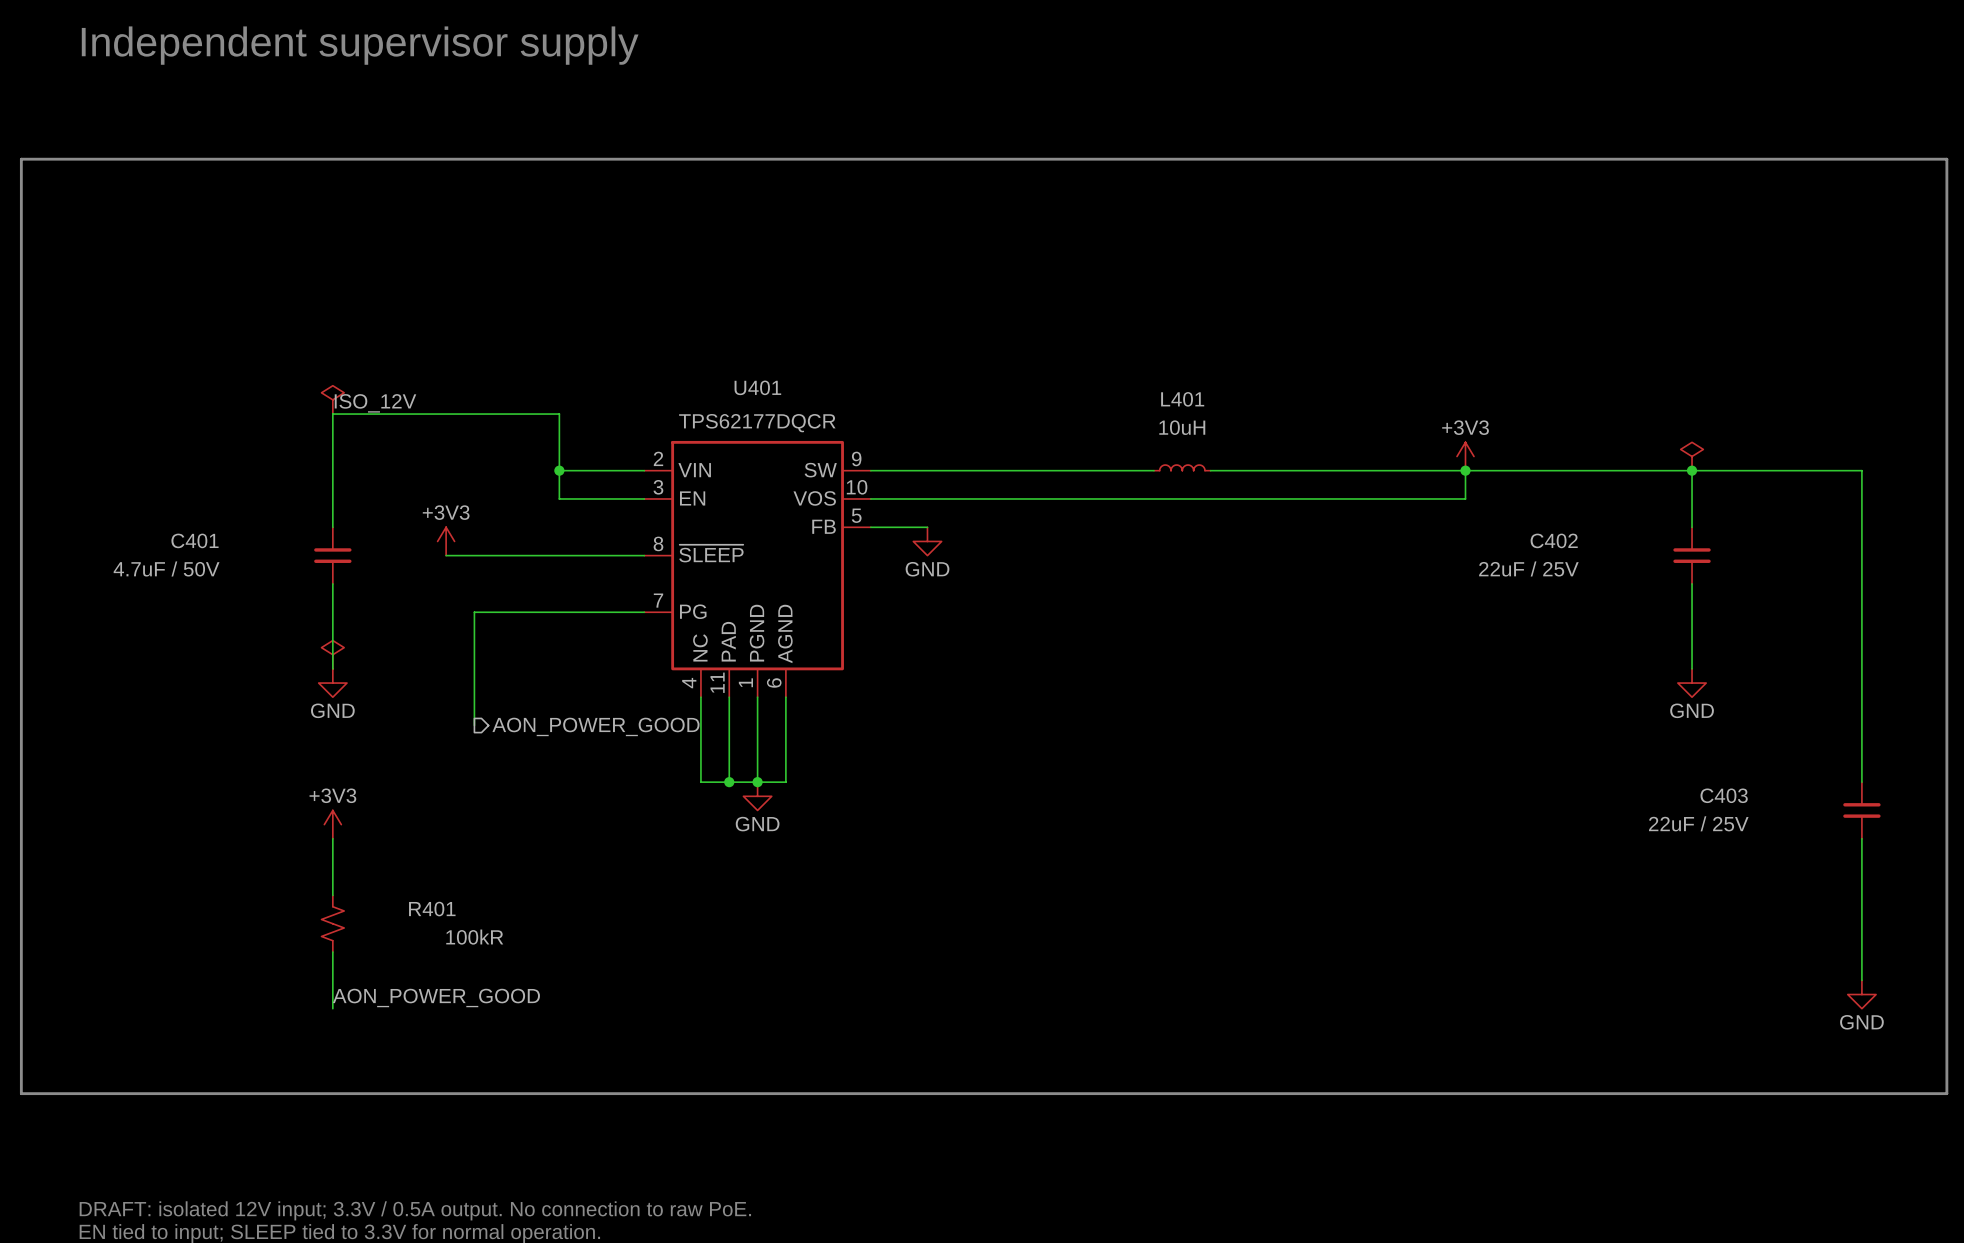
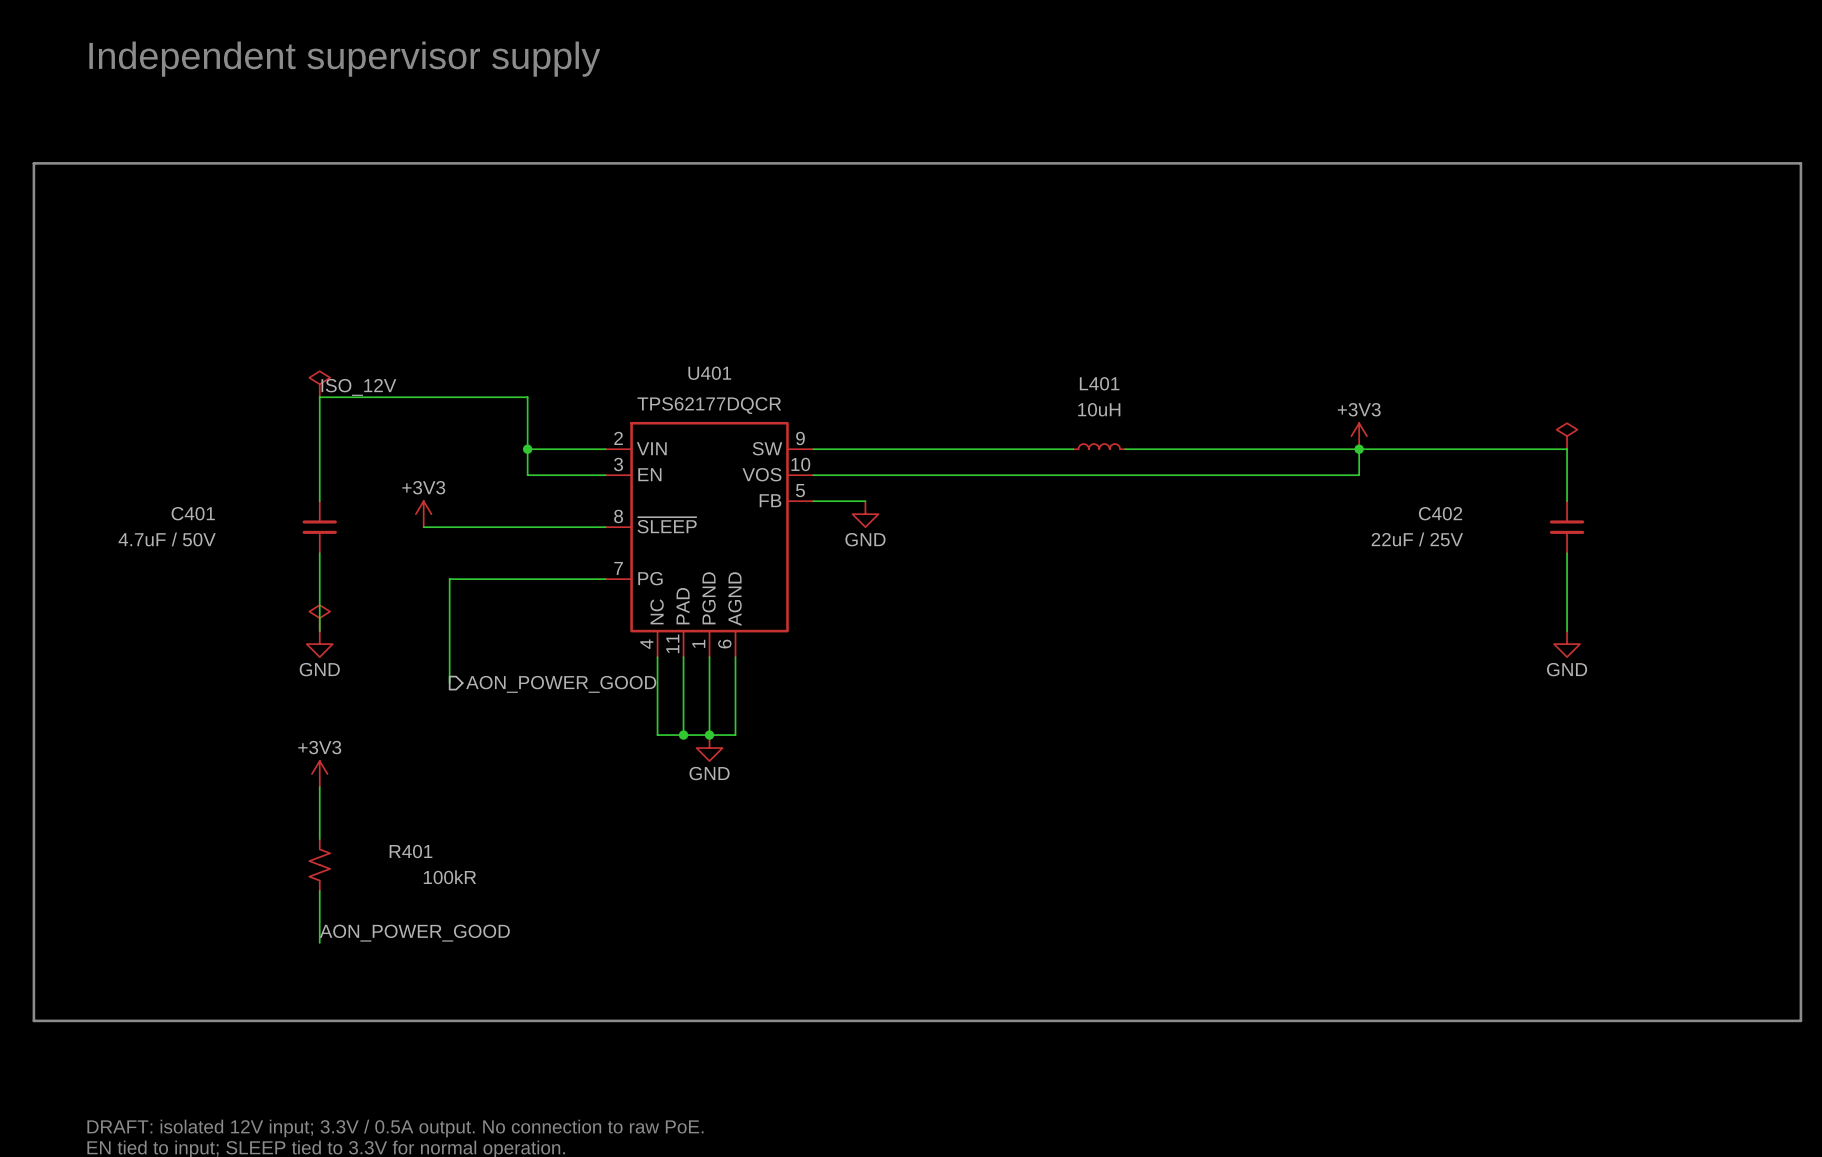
wire: (1692, 470) (1861, 470) (1861, 782) -> none
junction: (1692, 470) -> none
C403: 22uF / 25V (1861, 810) -> none
wire: (1861, 838) (1861, 980) -> none
power symbol: GND (1861, 994) -> none

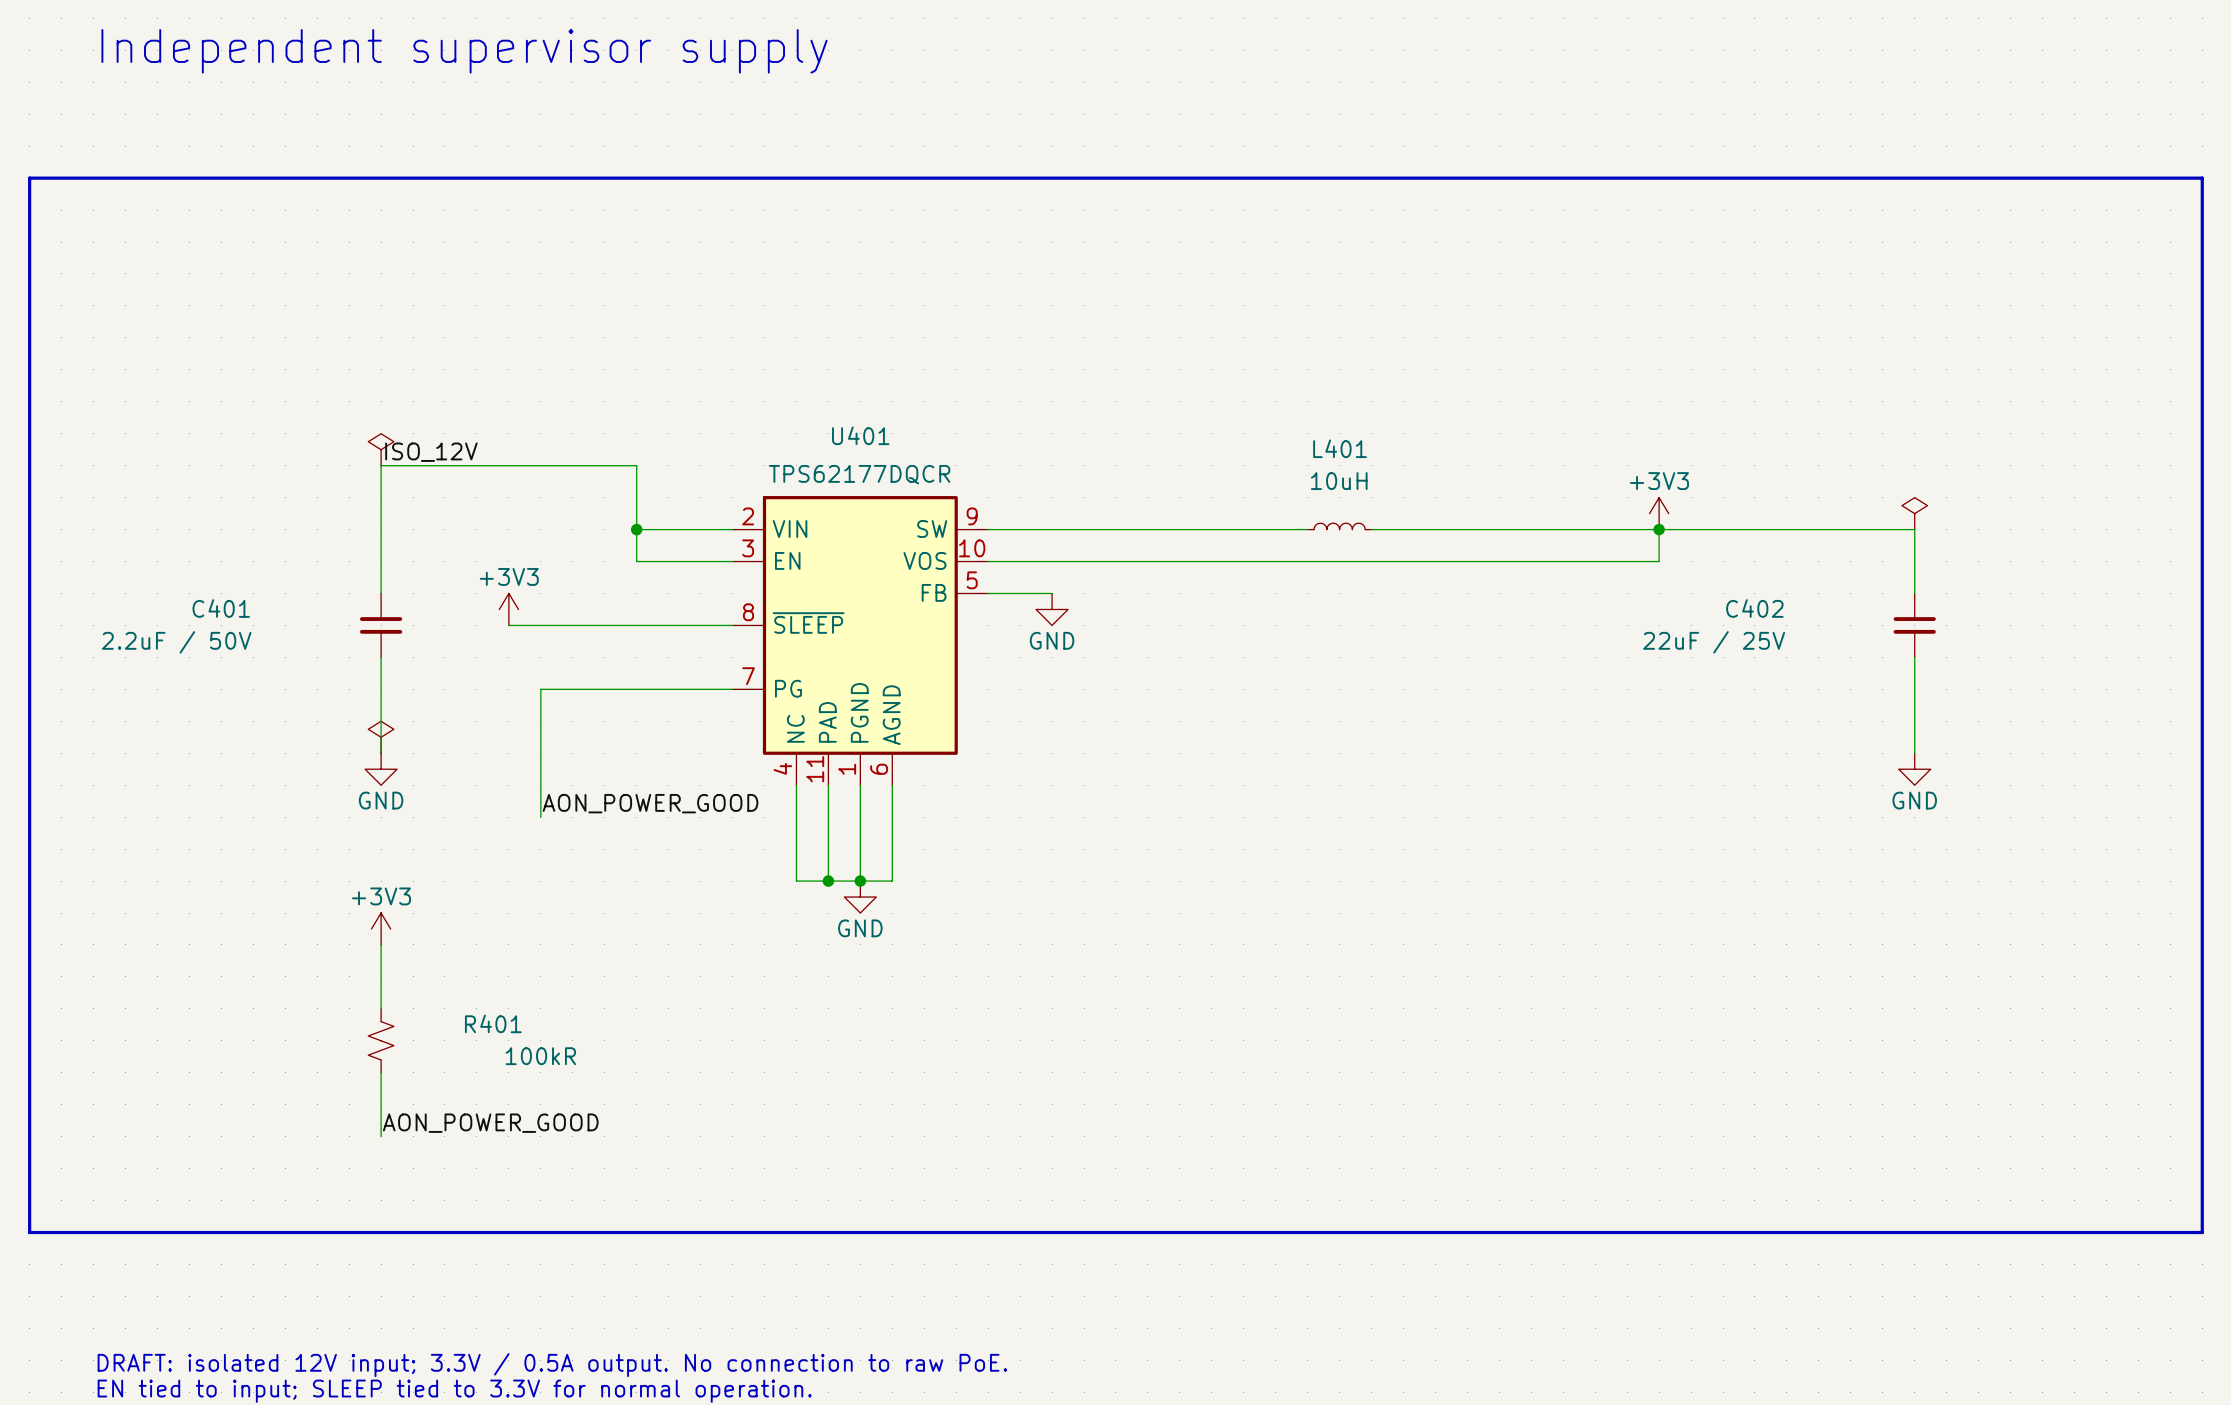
C401 value: 4.7uF / 50V (167, 539) -> 2.2uF / 50V (176, 642)
label: none -> AON_POWER_GOOD (650, 803)
hierarchical label: AON_POWER_GOOD (561, 684) -> none

